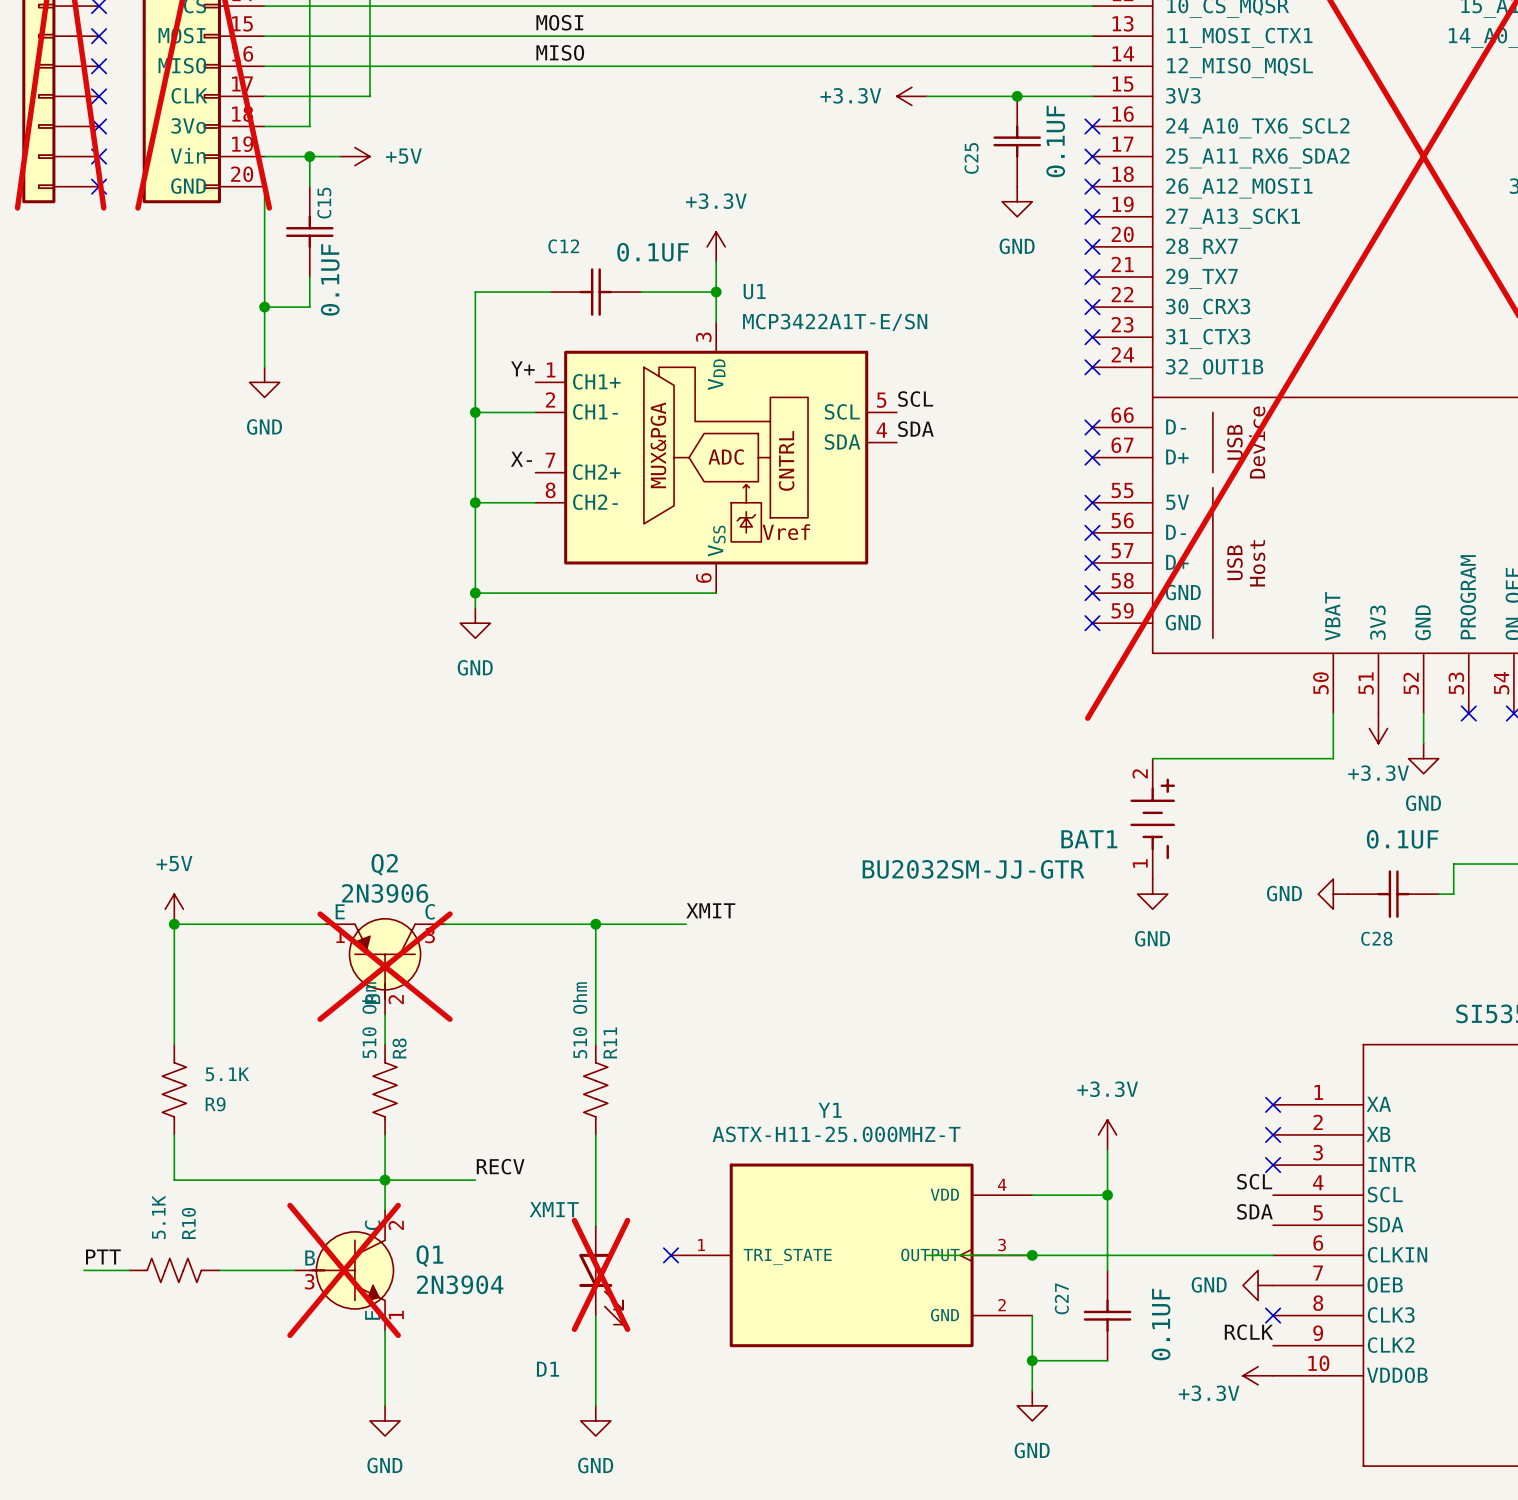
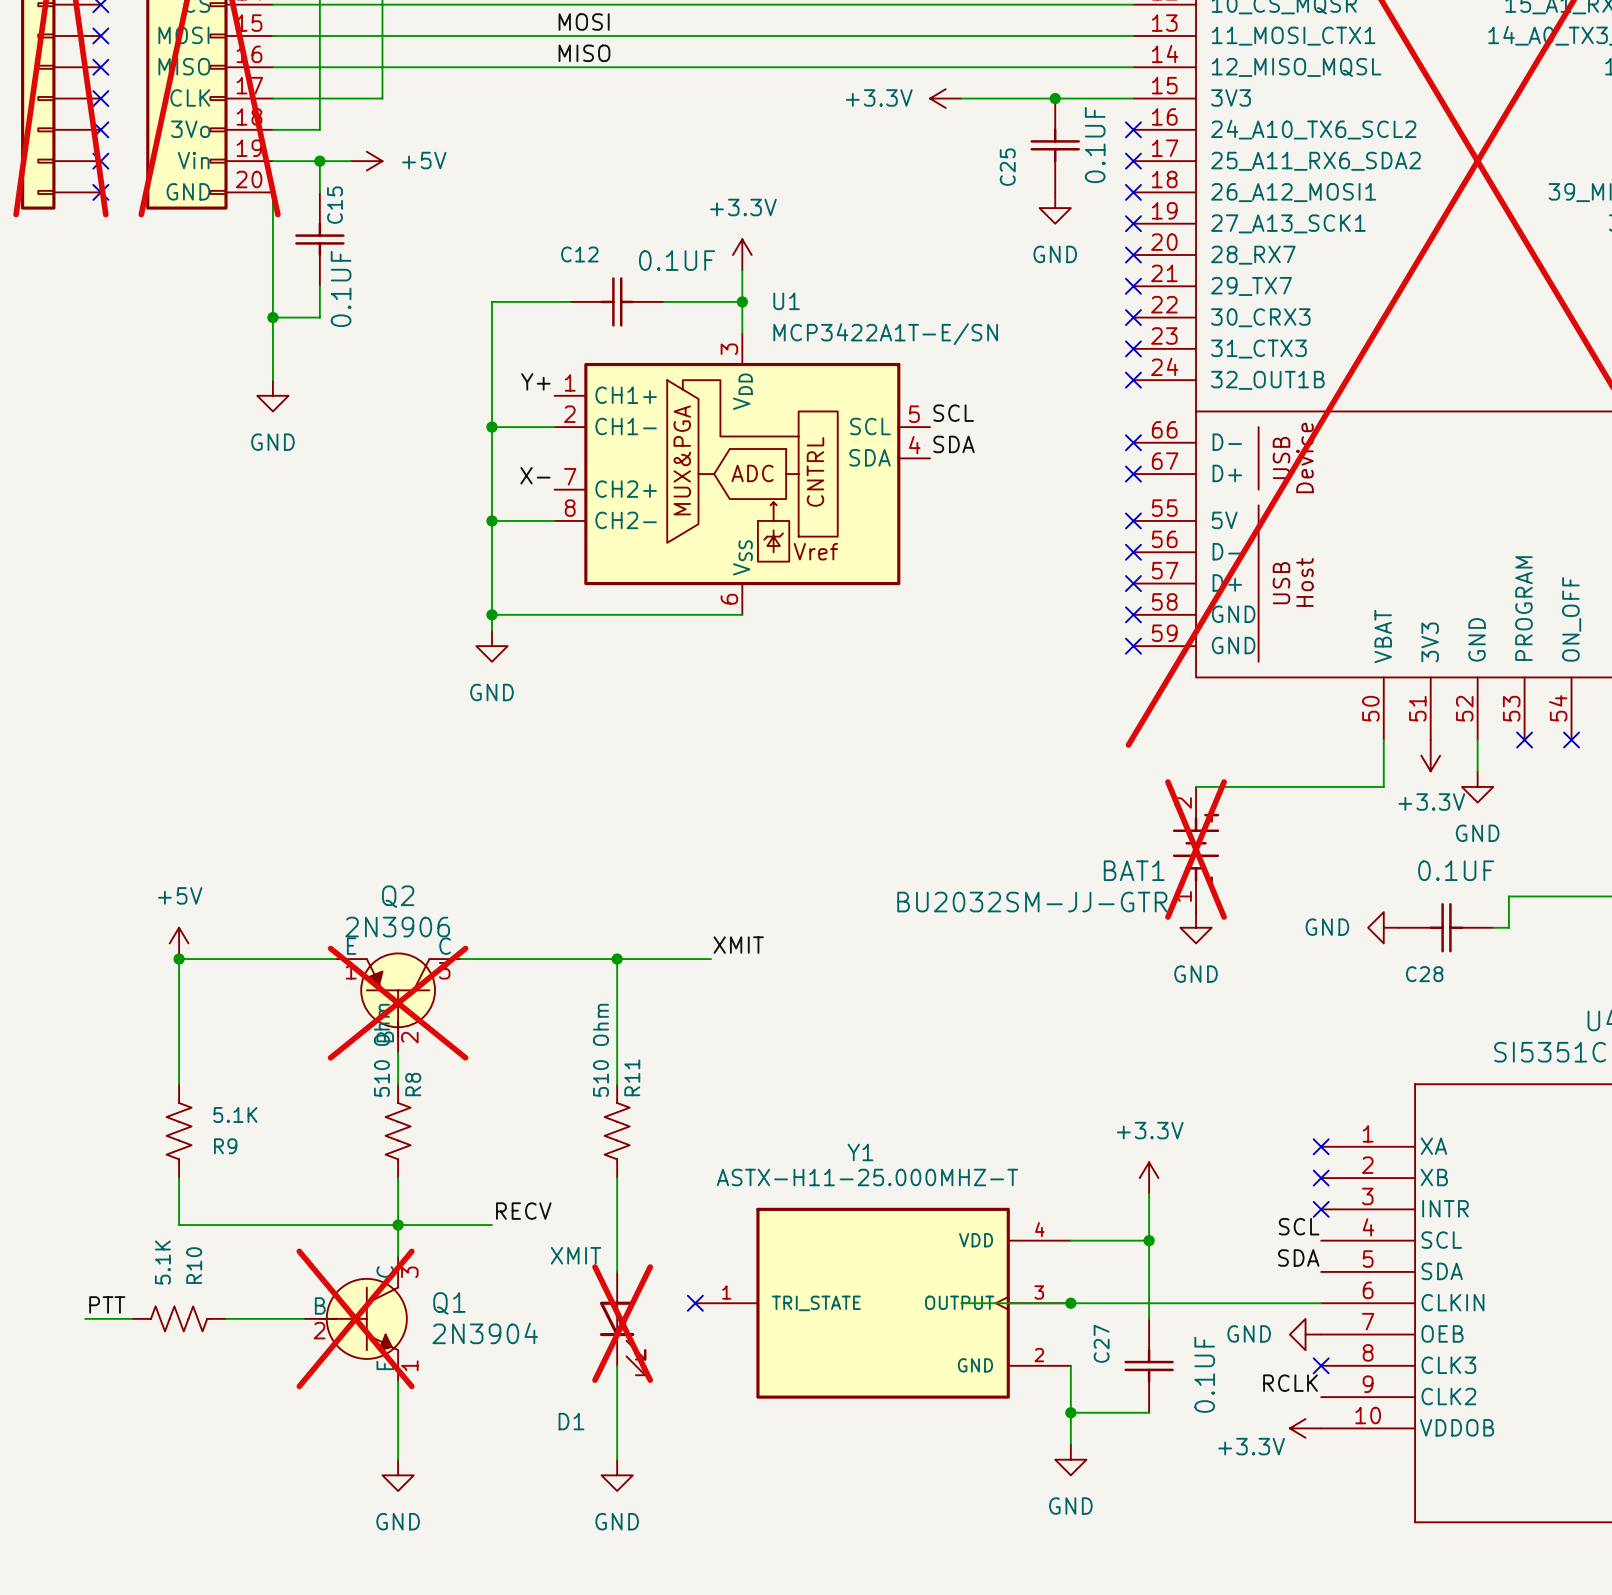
BAT1 do-not-place cross: none -> (1196, 849)
Q1 pin number: 2 (396, 1225) -> 3 (409, 1272)
Q1 pin number: 3 (309, 1281) -> 2 (319, 1330)

